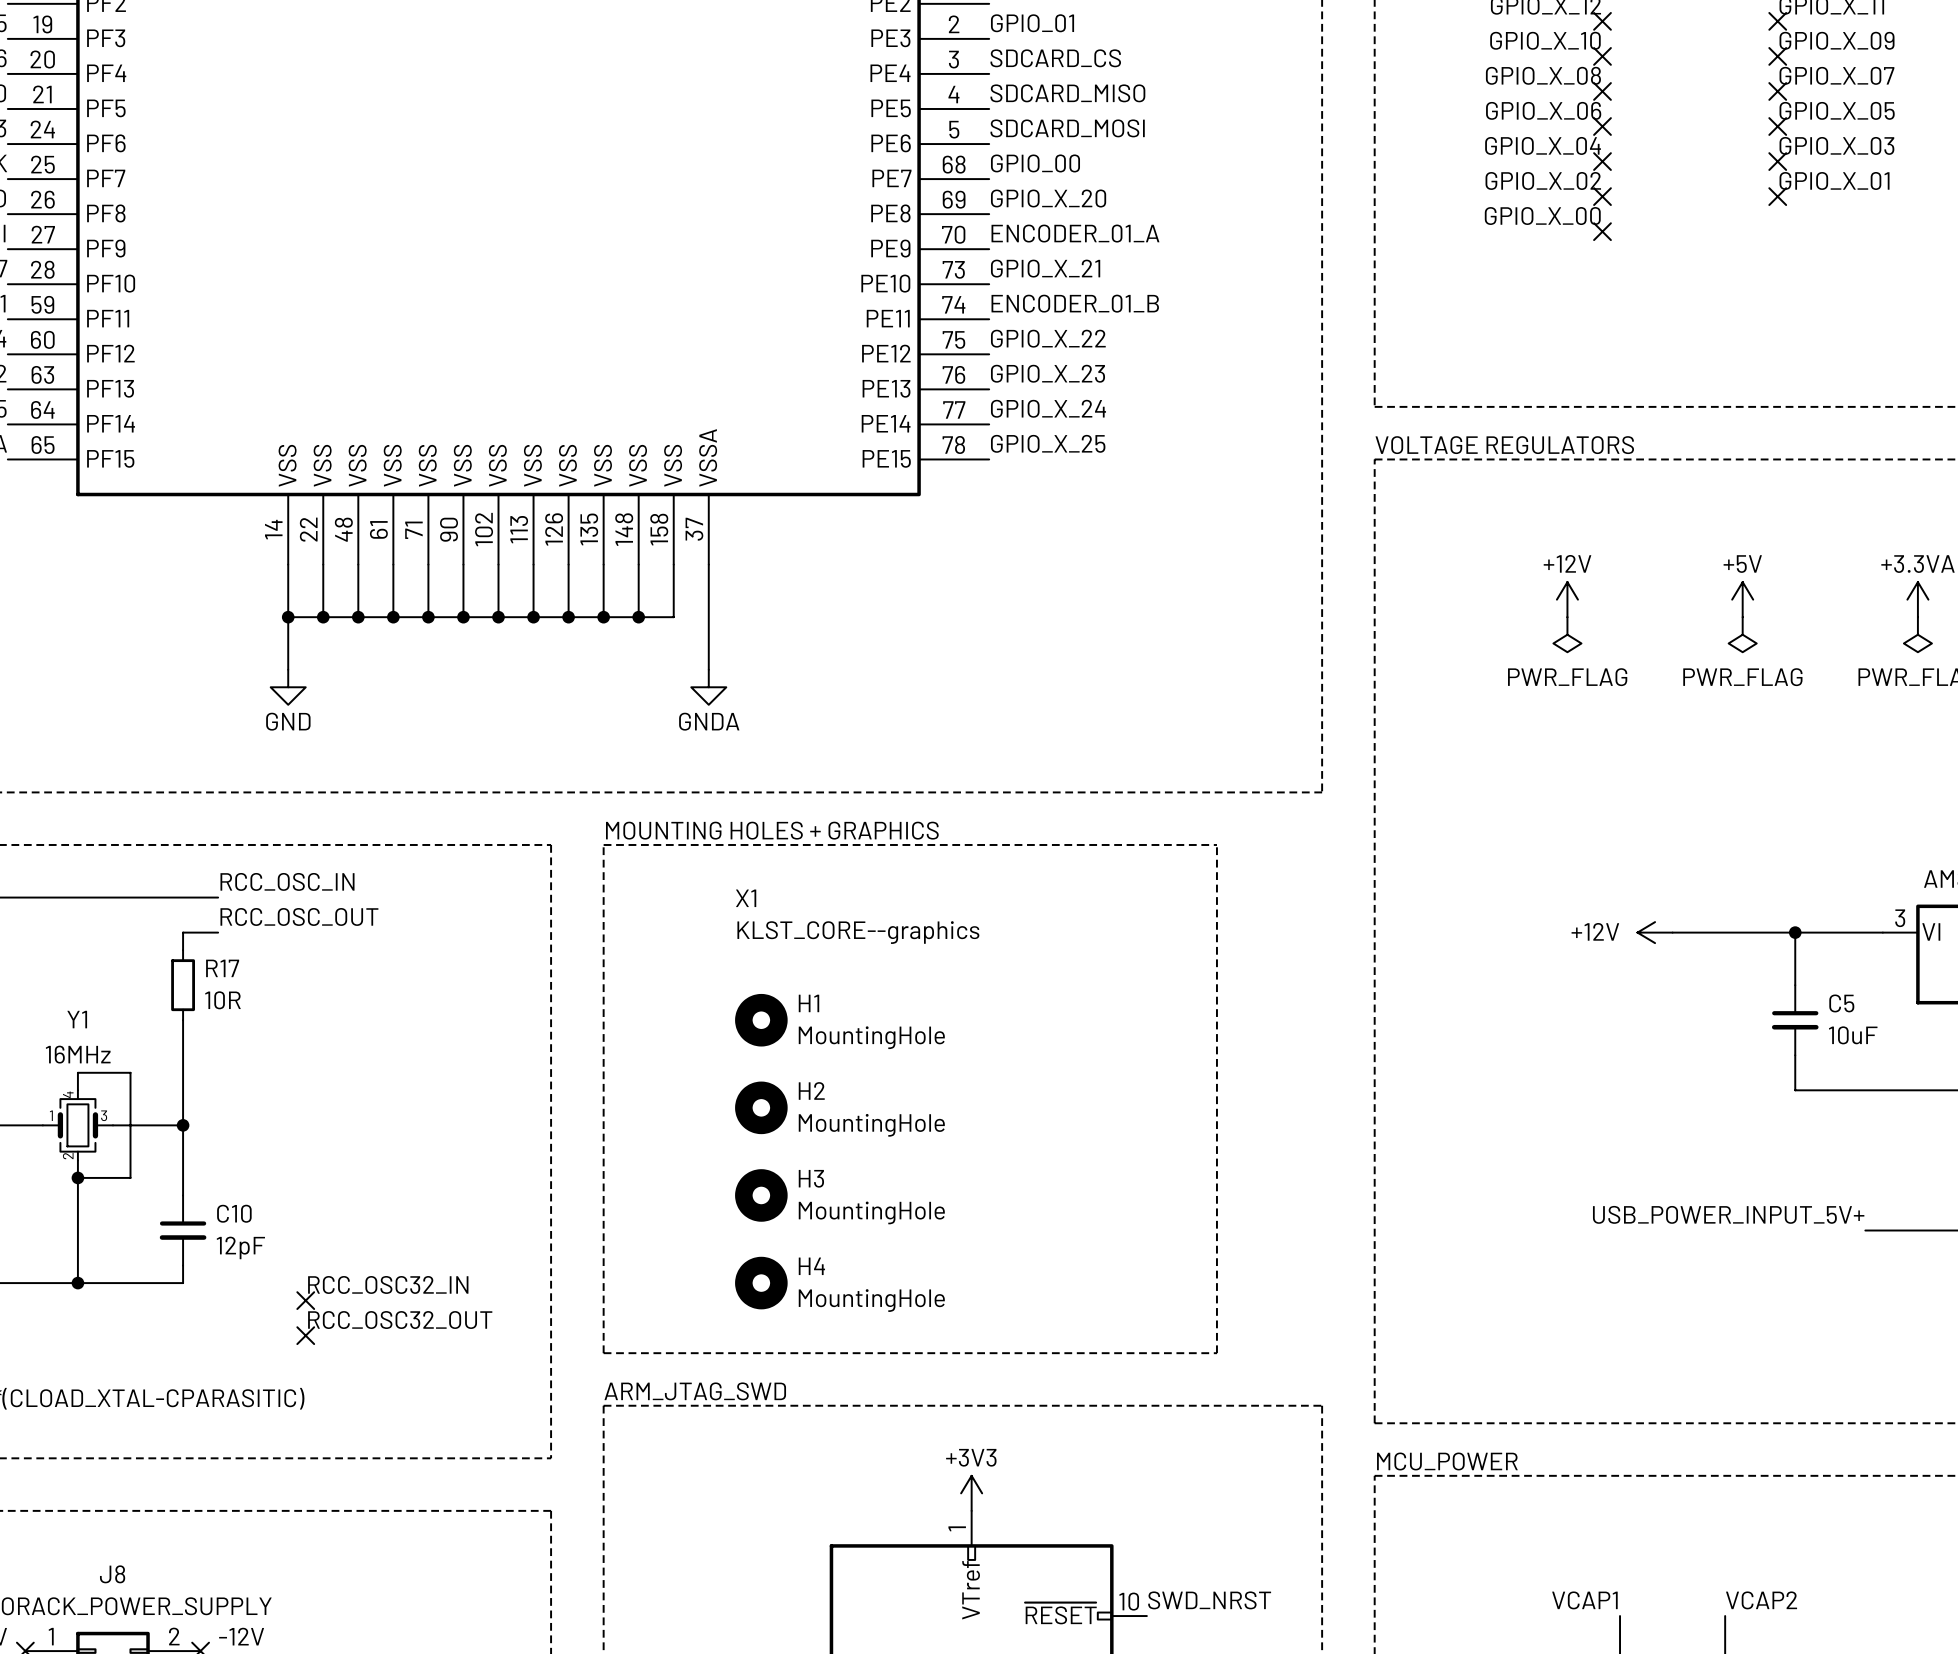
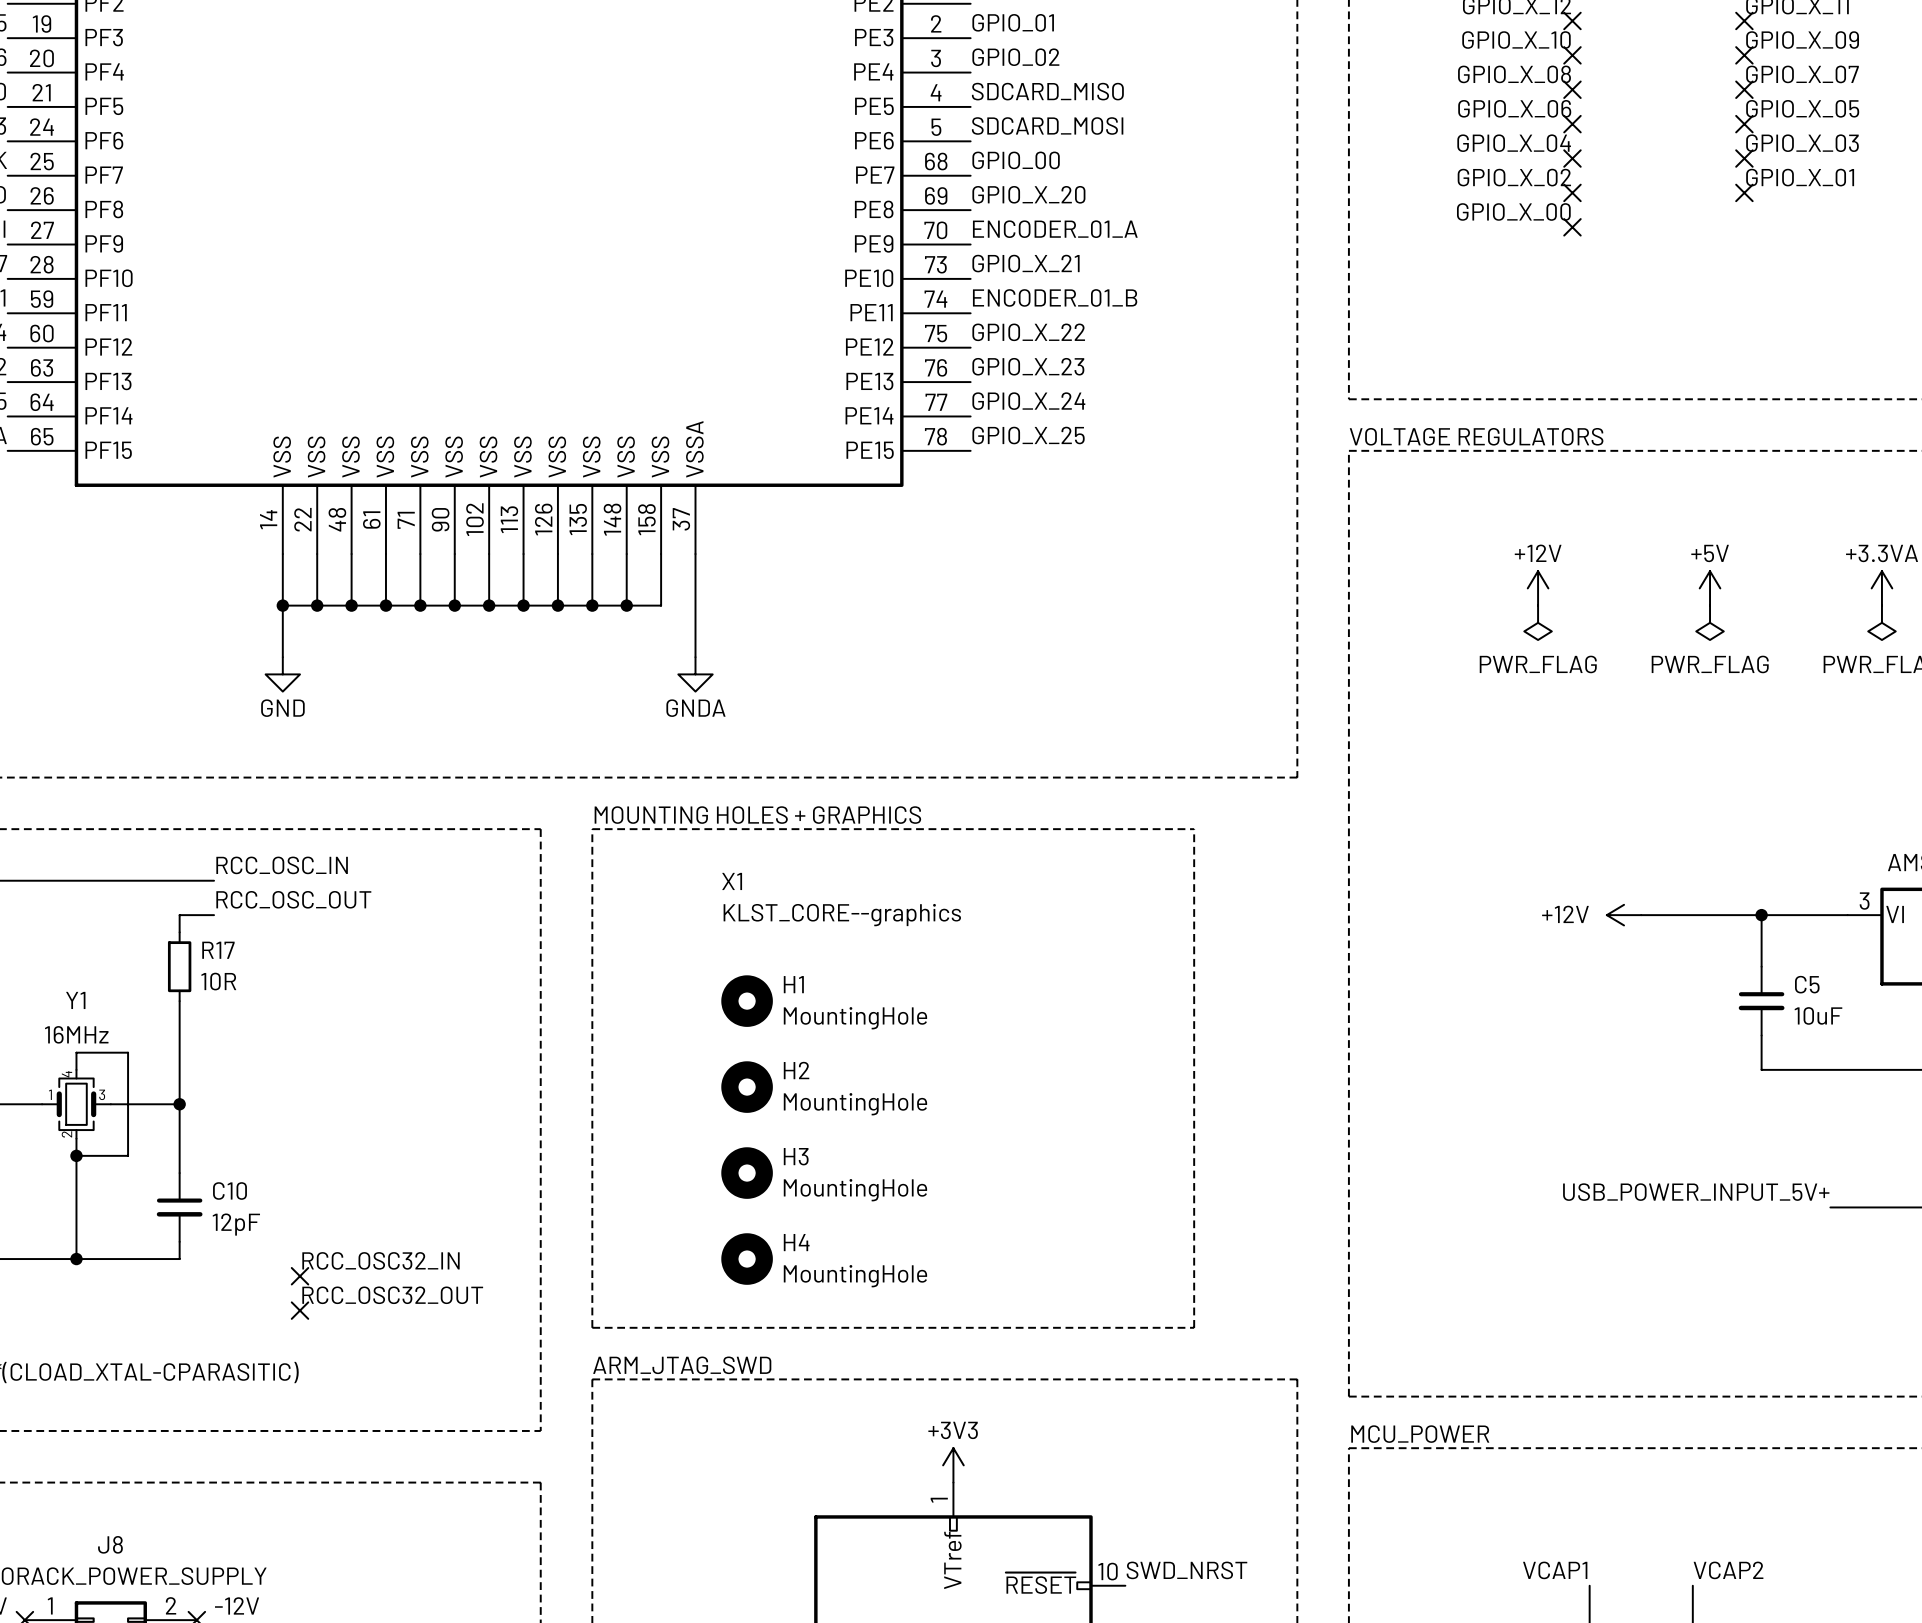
label: SDCARD_CS (1055, 58) -> GPIO_02 (1015, 57)

